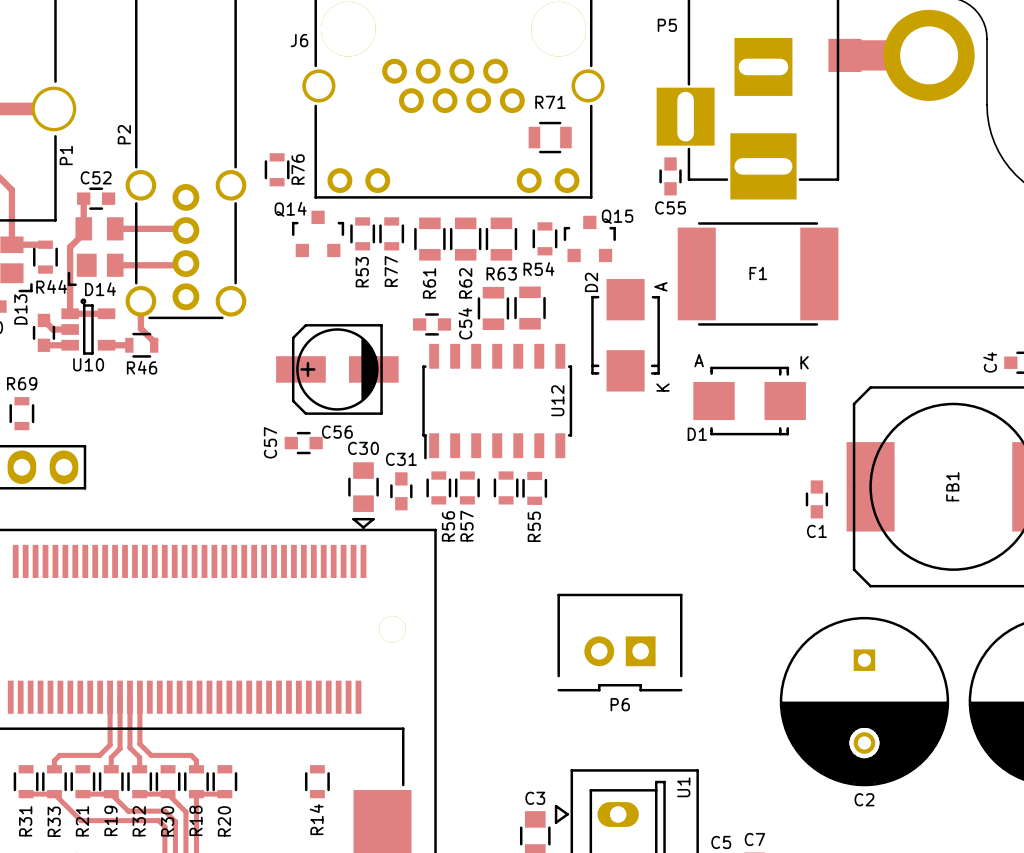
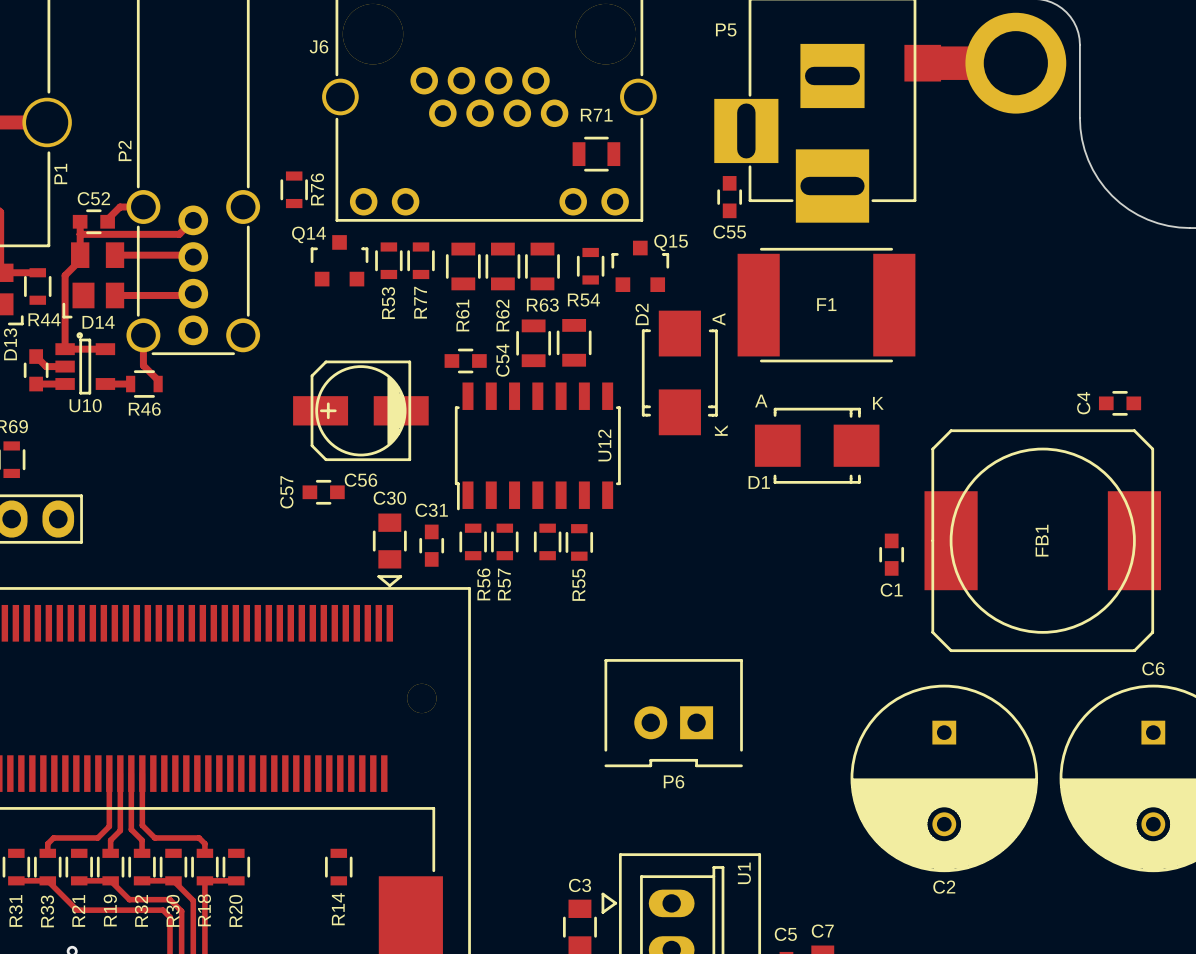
track: none -> (143, 206) (120, 206) (107, 219)
track: none -> (193, 220) (179, 234) (80, 234)

